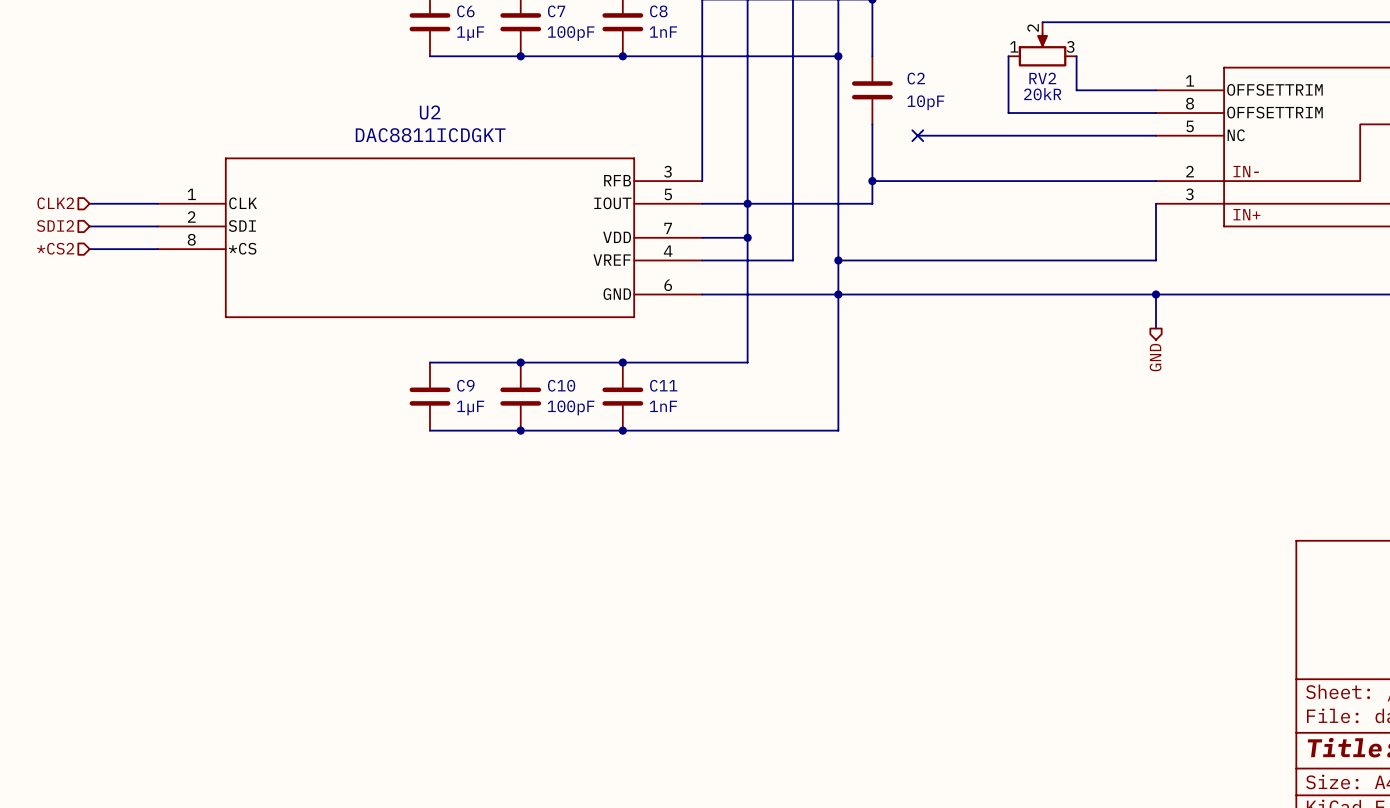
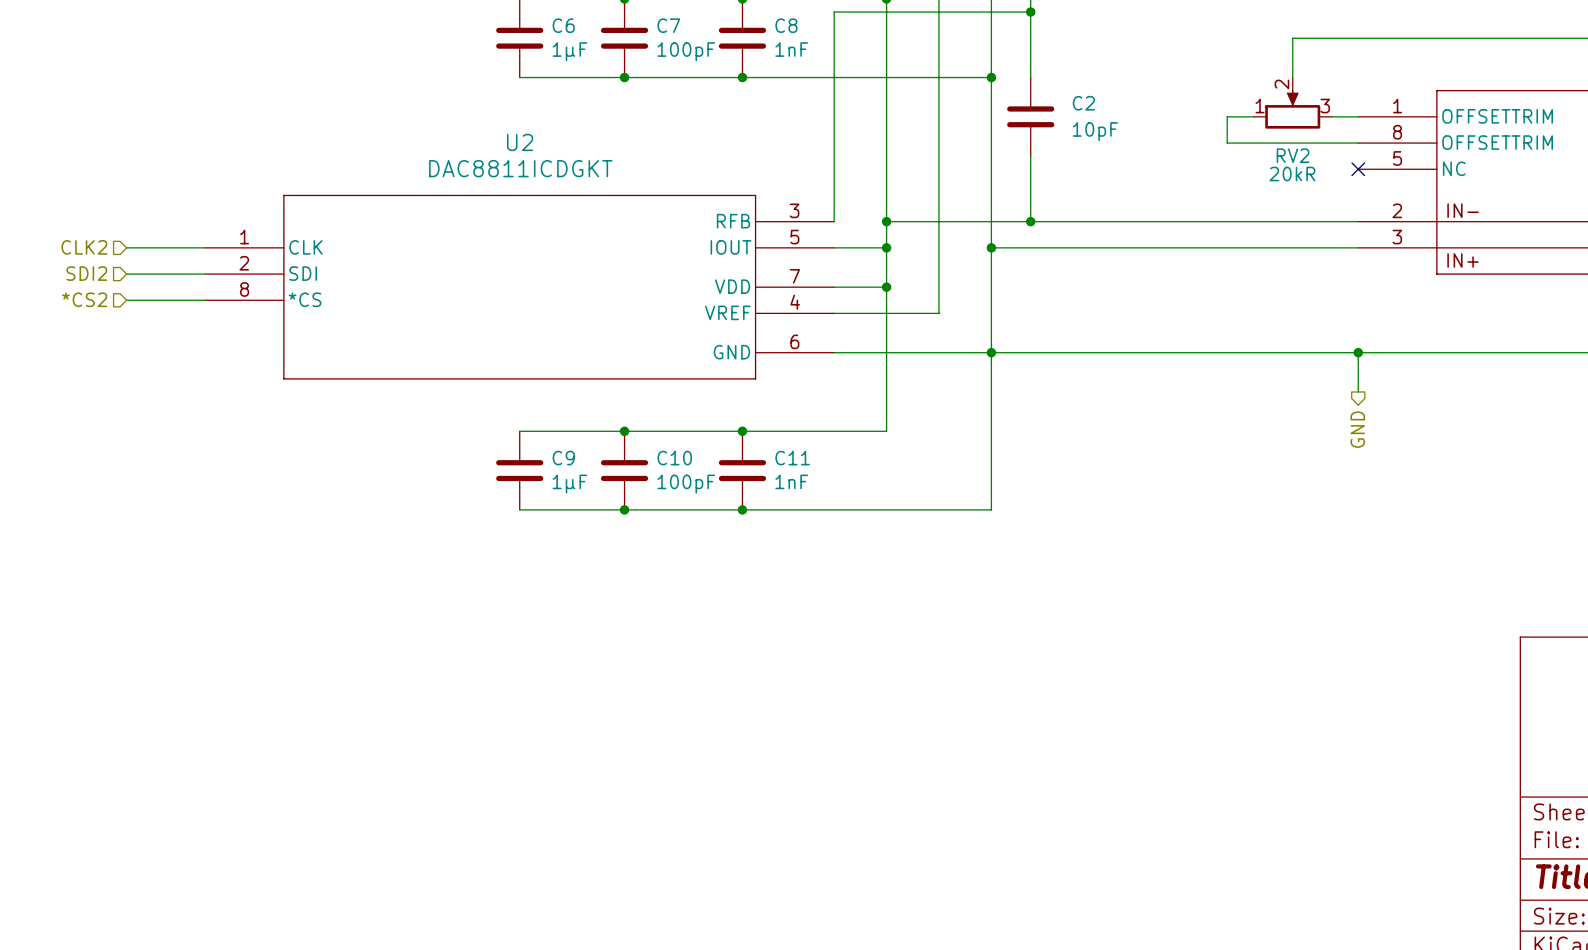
wire: (1042, 22) (1099, 22) -> (1292, 77) (1292, 38)
RV2 position: (1042, 44) -> (1292, 103)
wire: (1008, 56) (1008, 113) (1042, 113) -> (1253, 116) (1227, 116) (1227, 143)
wire: (1076, 56) (1076, 90) (1133, 90) -> none
RV2 name position: RV2 (1042, 78) -> RV2 (1293, 155)
RV2 value position: 20kR (1042, 94) -> 20kR (1292, 174)
wire: (917, 135) (1156, 135) -> none
no-connect mark: (917, 135) -> none
no-connect mark: none -> (1358, 169)
junction: none -> (886, 221)
wire: (872, 181) (872, 203) -> (1030, 221) (886, 221)
wire: (747, 203) (838, 203) -> none
junction: none -> (991, 247)
wire: (1156, 203) (1156, 260) (838, 260) -> (1358, 247) (1030, 247)
junction: (838, 260) -> none

